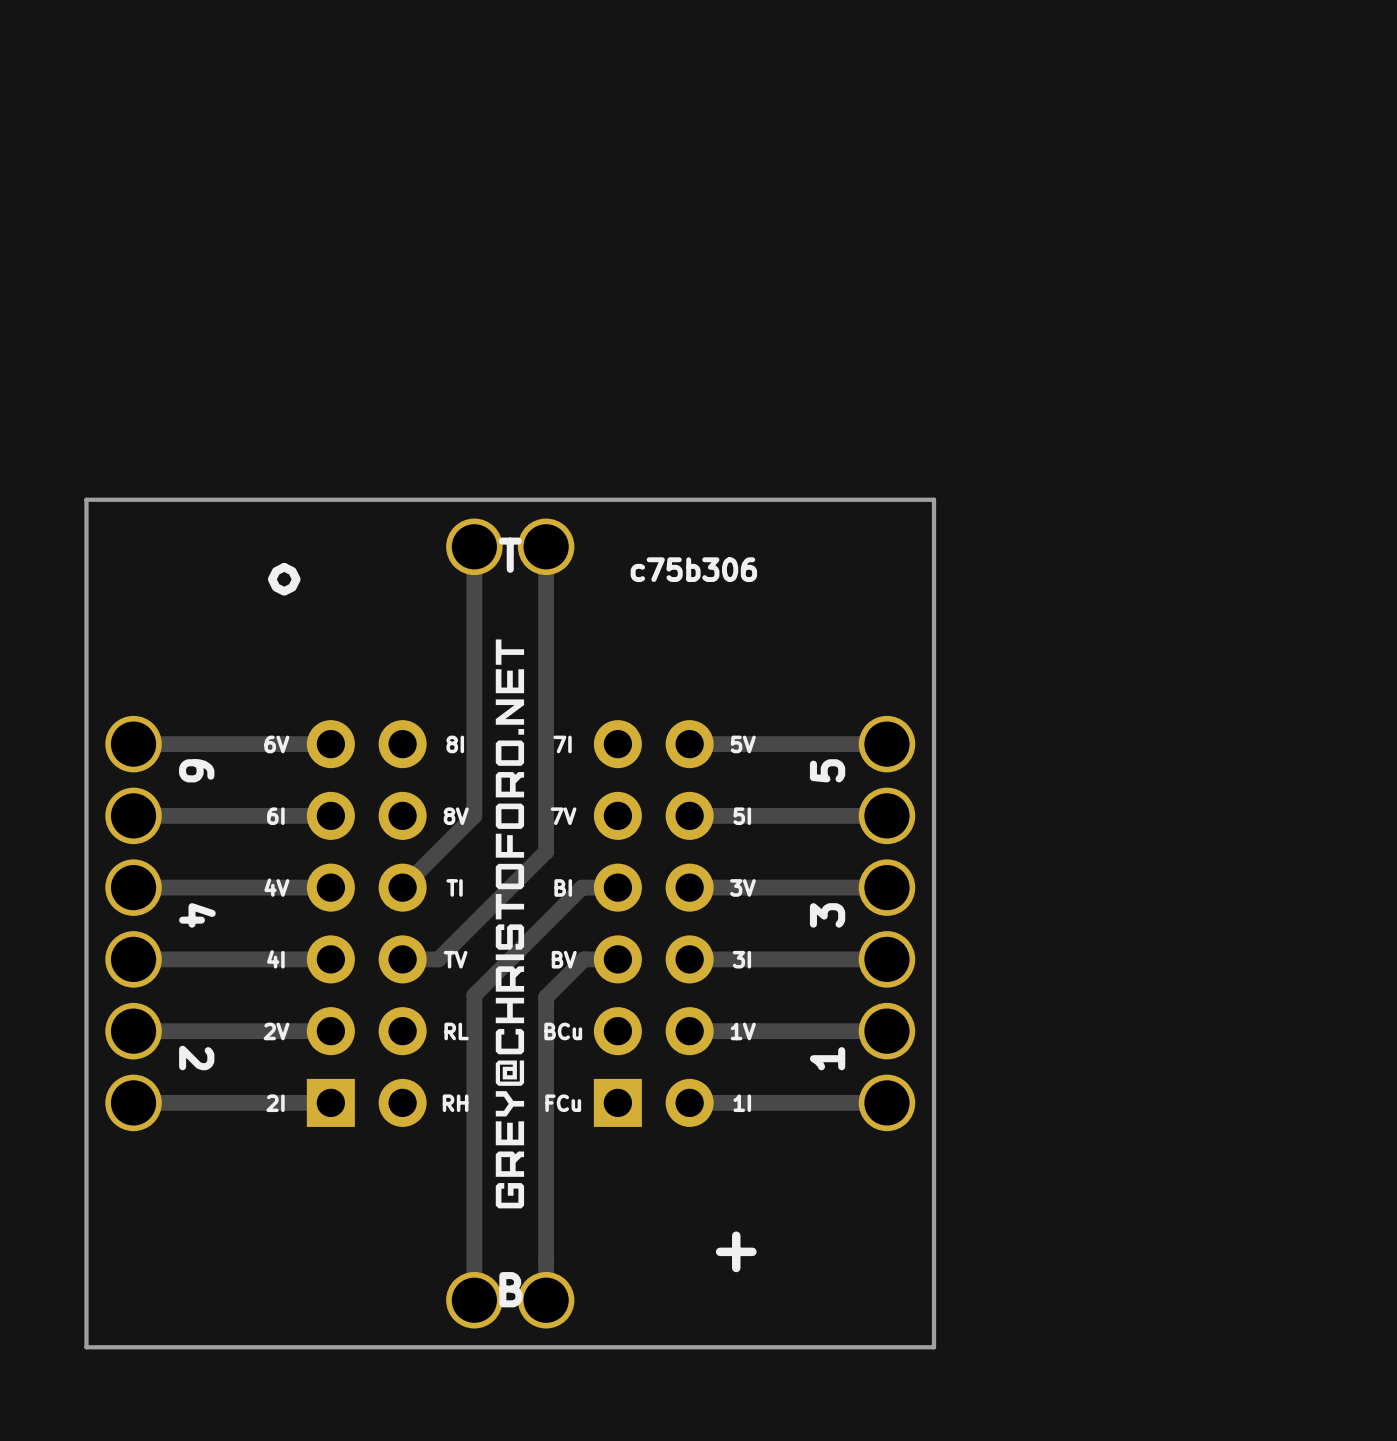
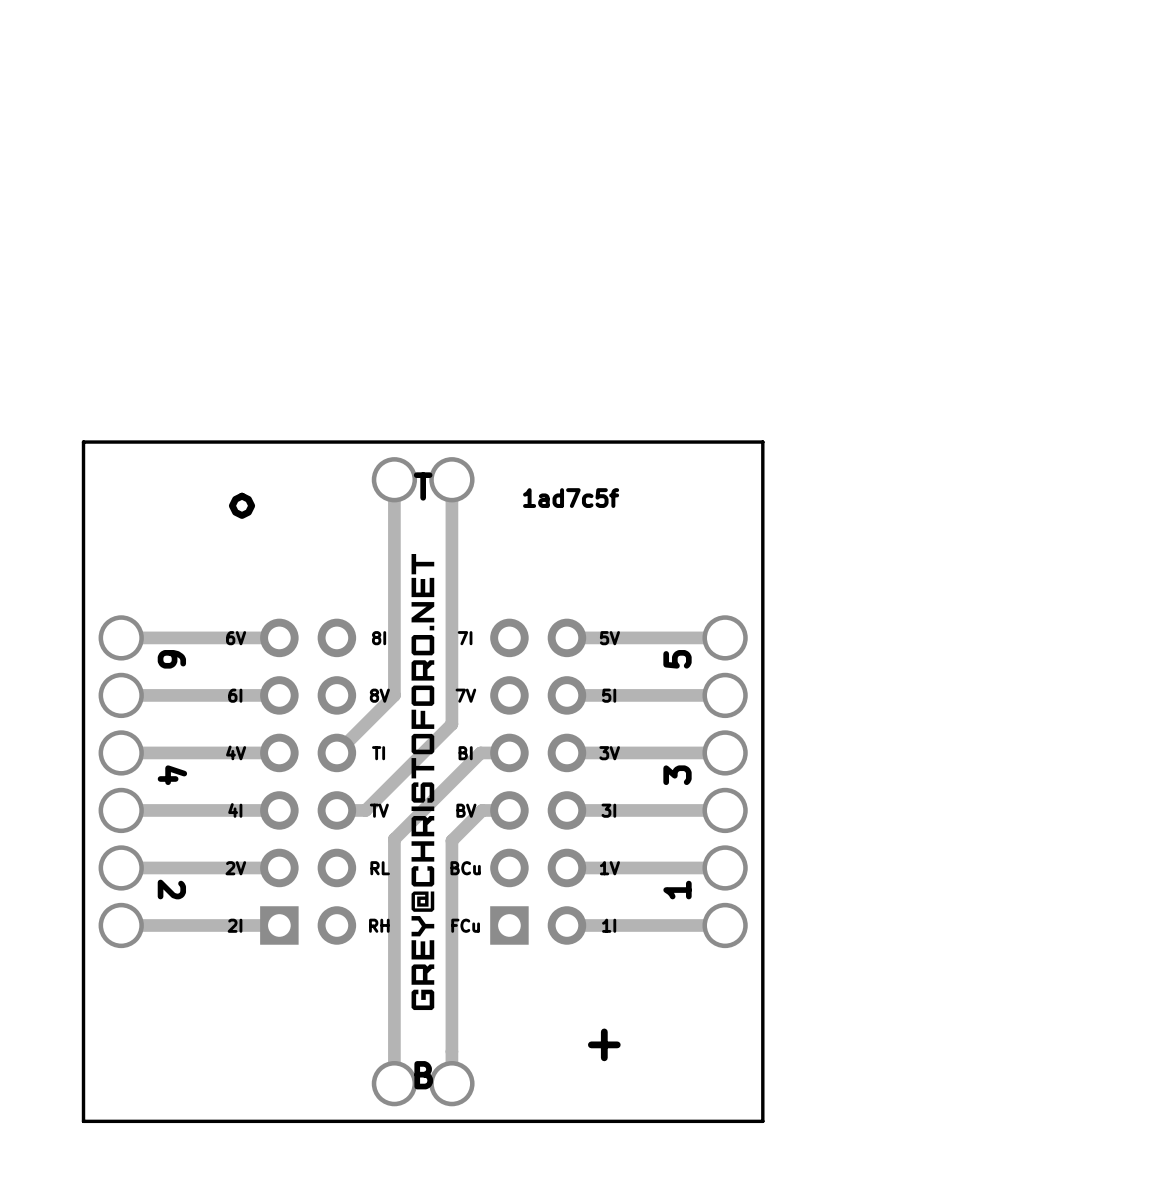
text: c75b306 (693, 569) -> 1ad7c5f (571, 498)

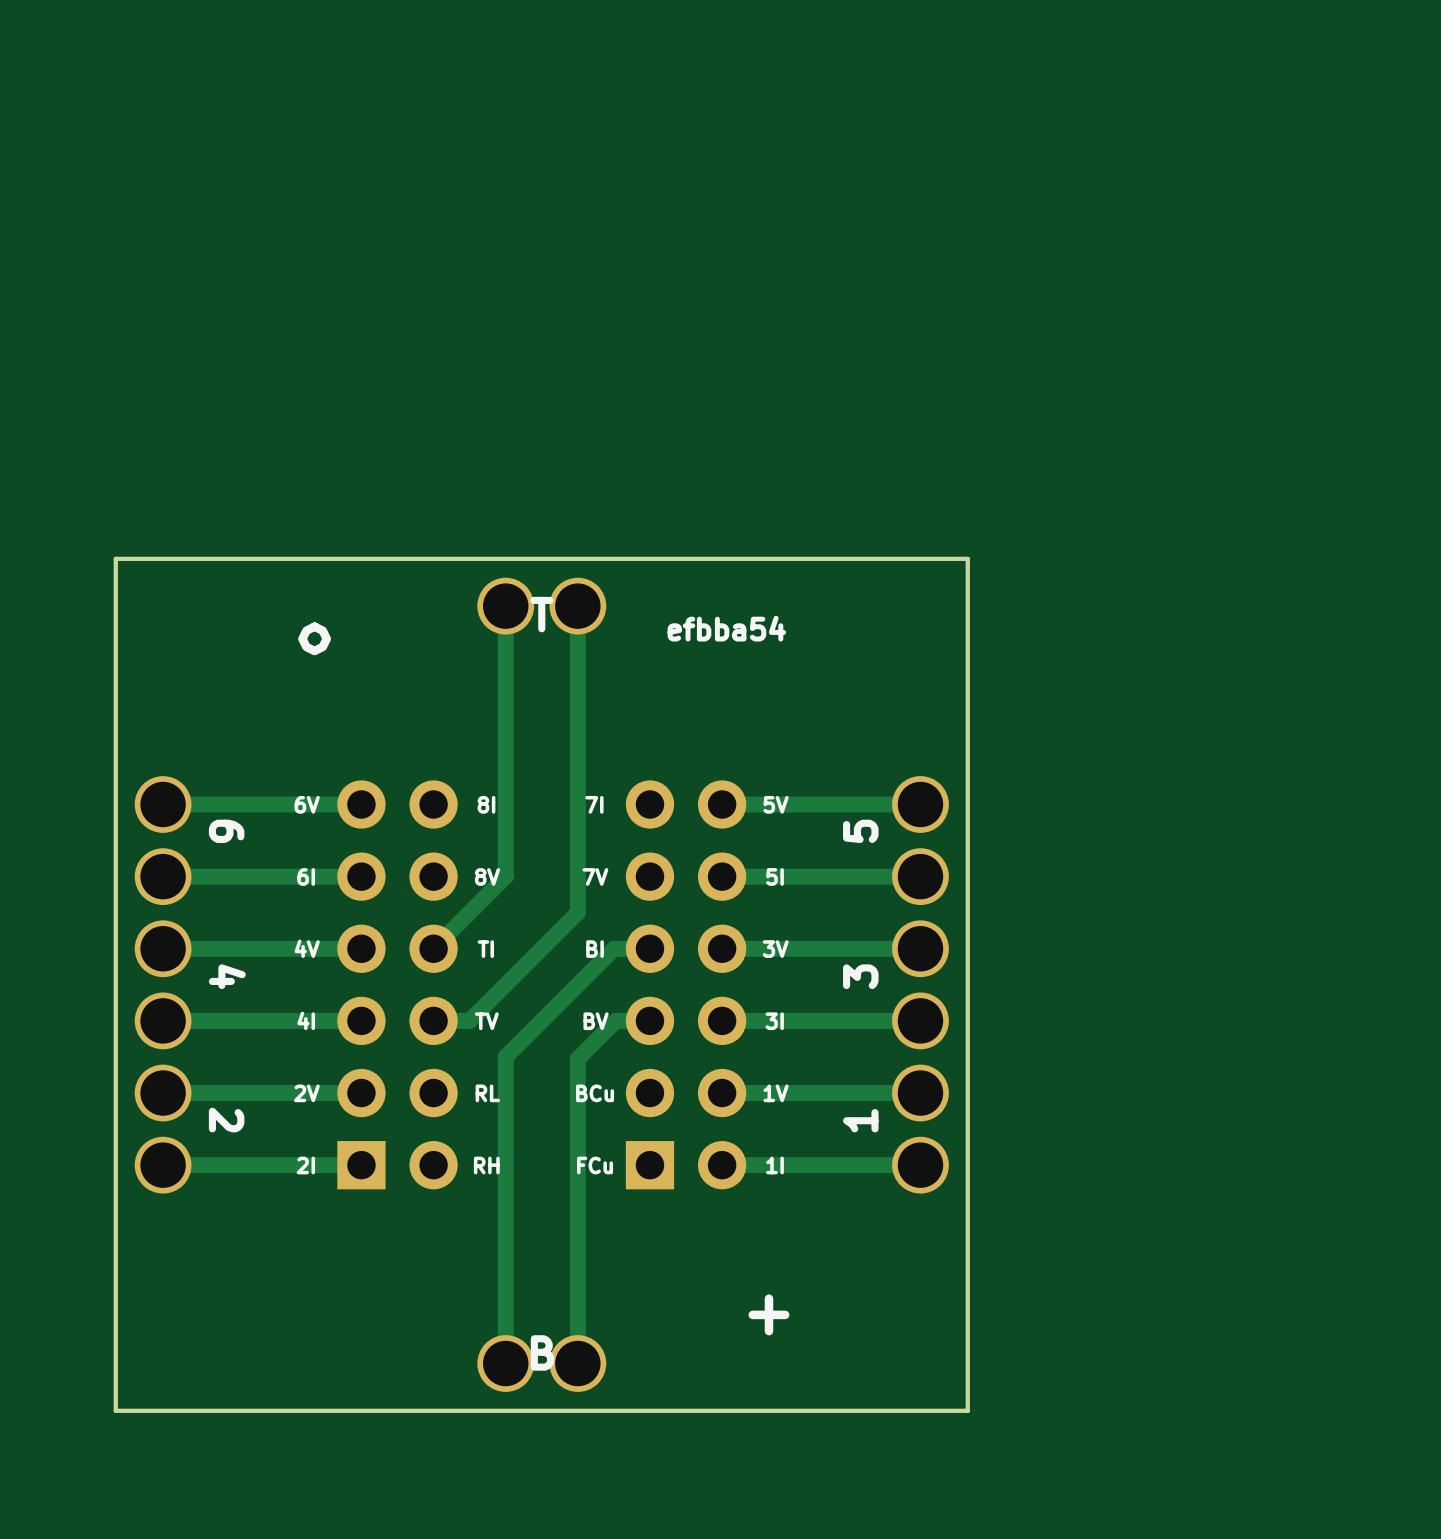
text: 1ad7c5f (571, 498) -> efbba54 (726, 628)
drawing: [411, 554, 435, 1011] -> none

